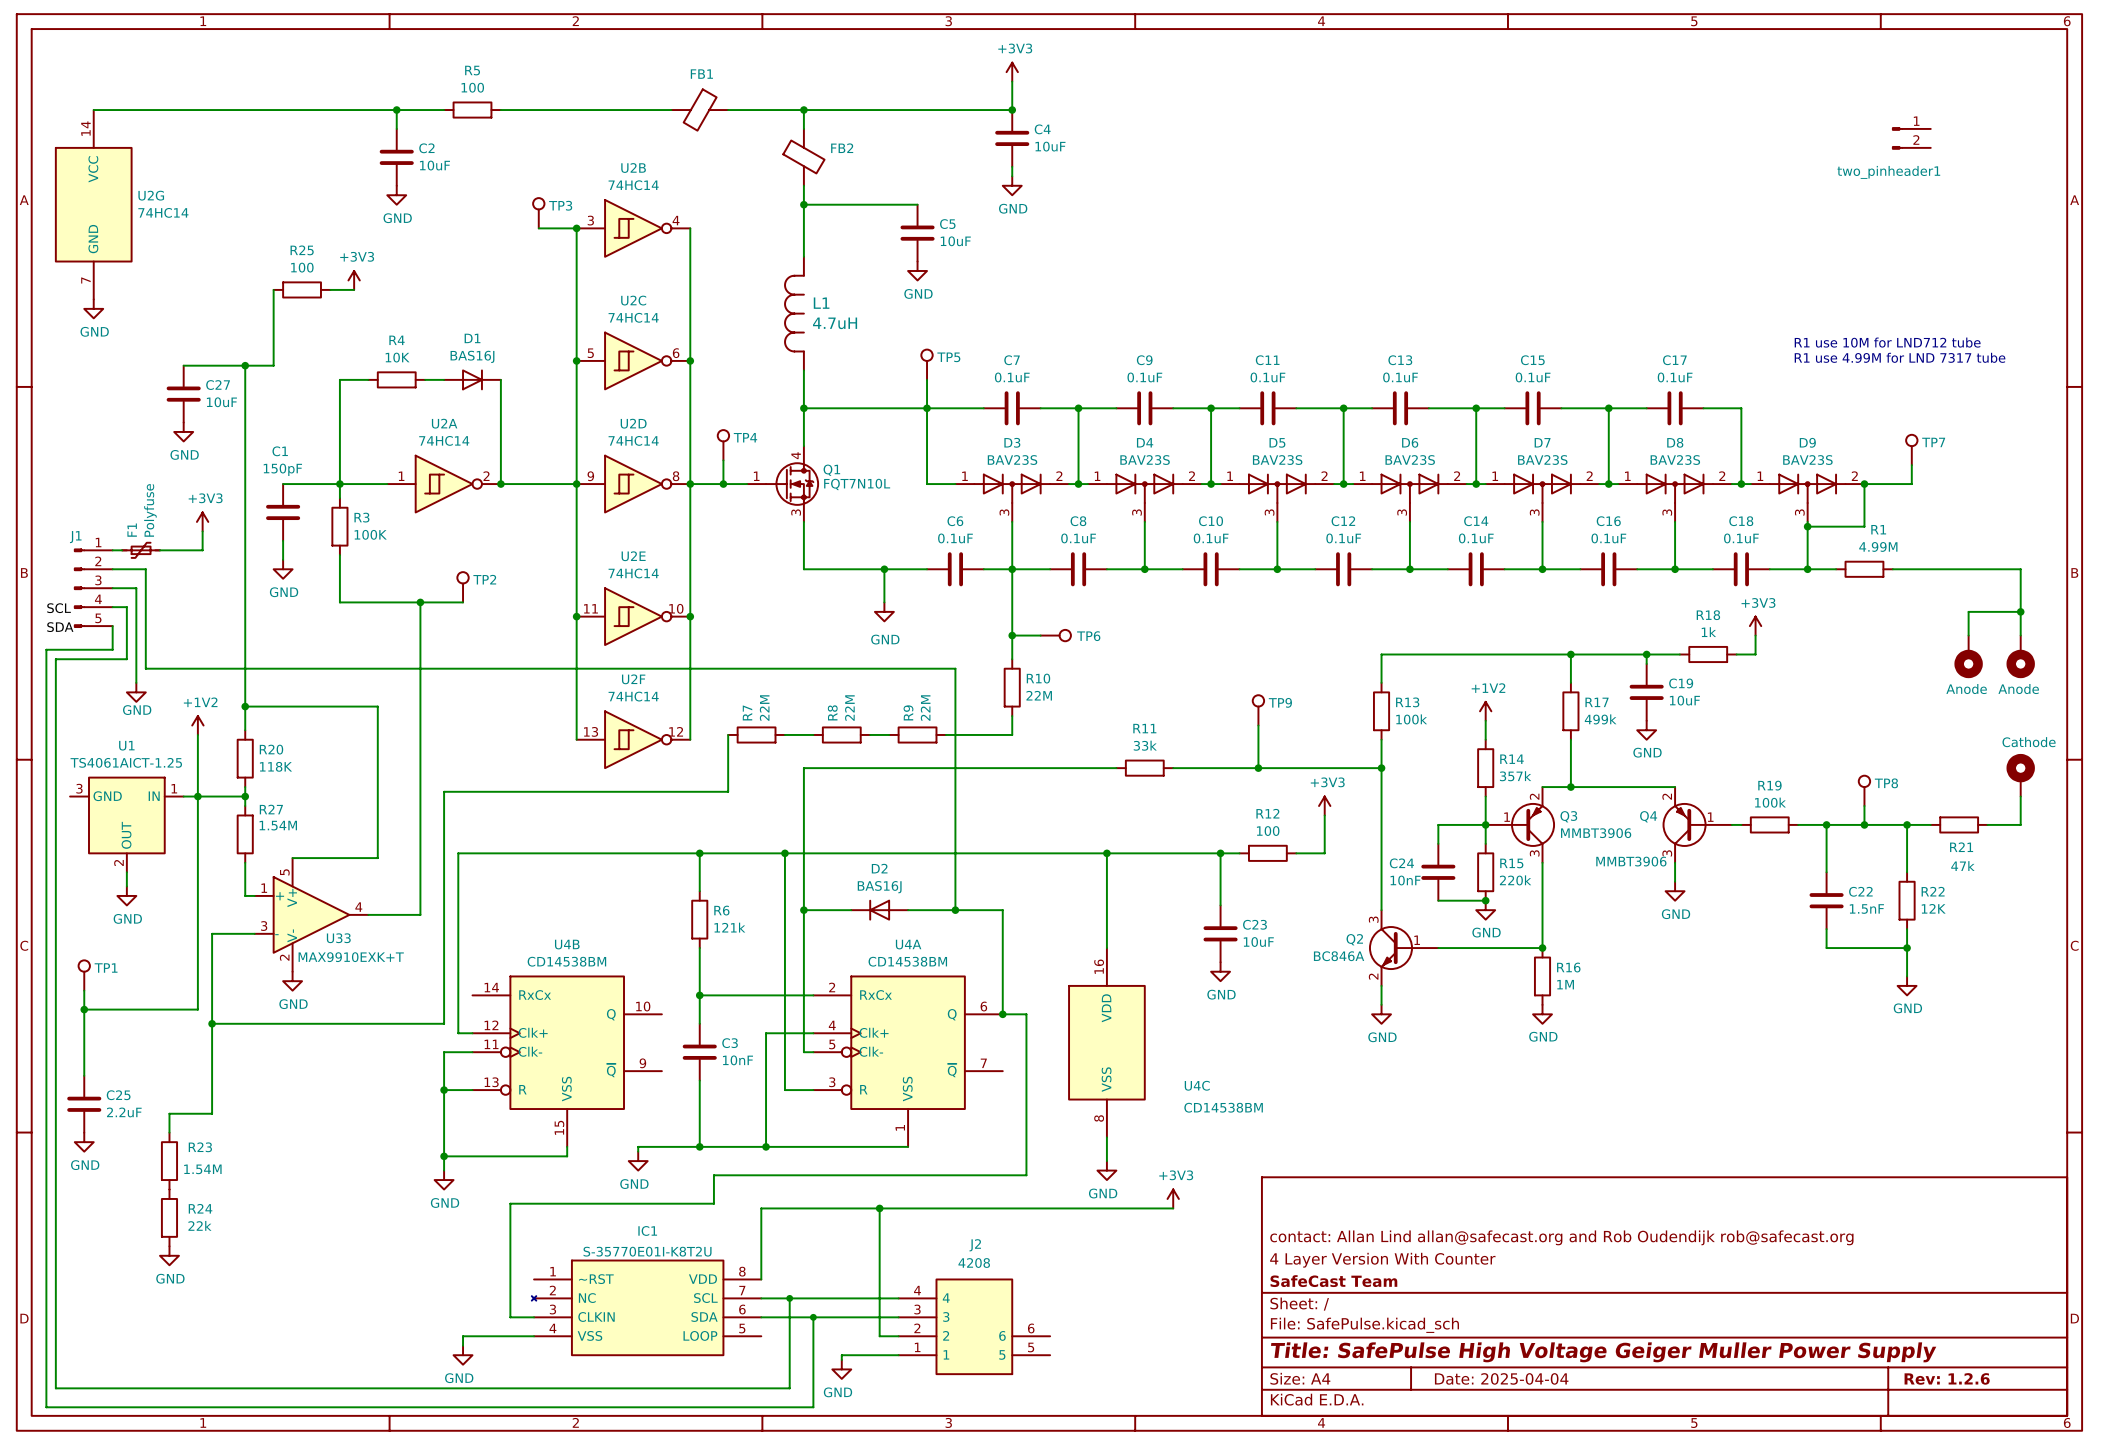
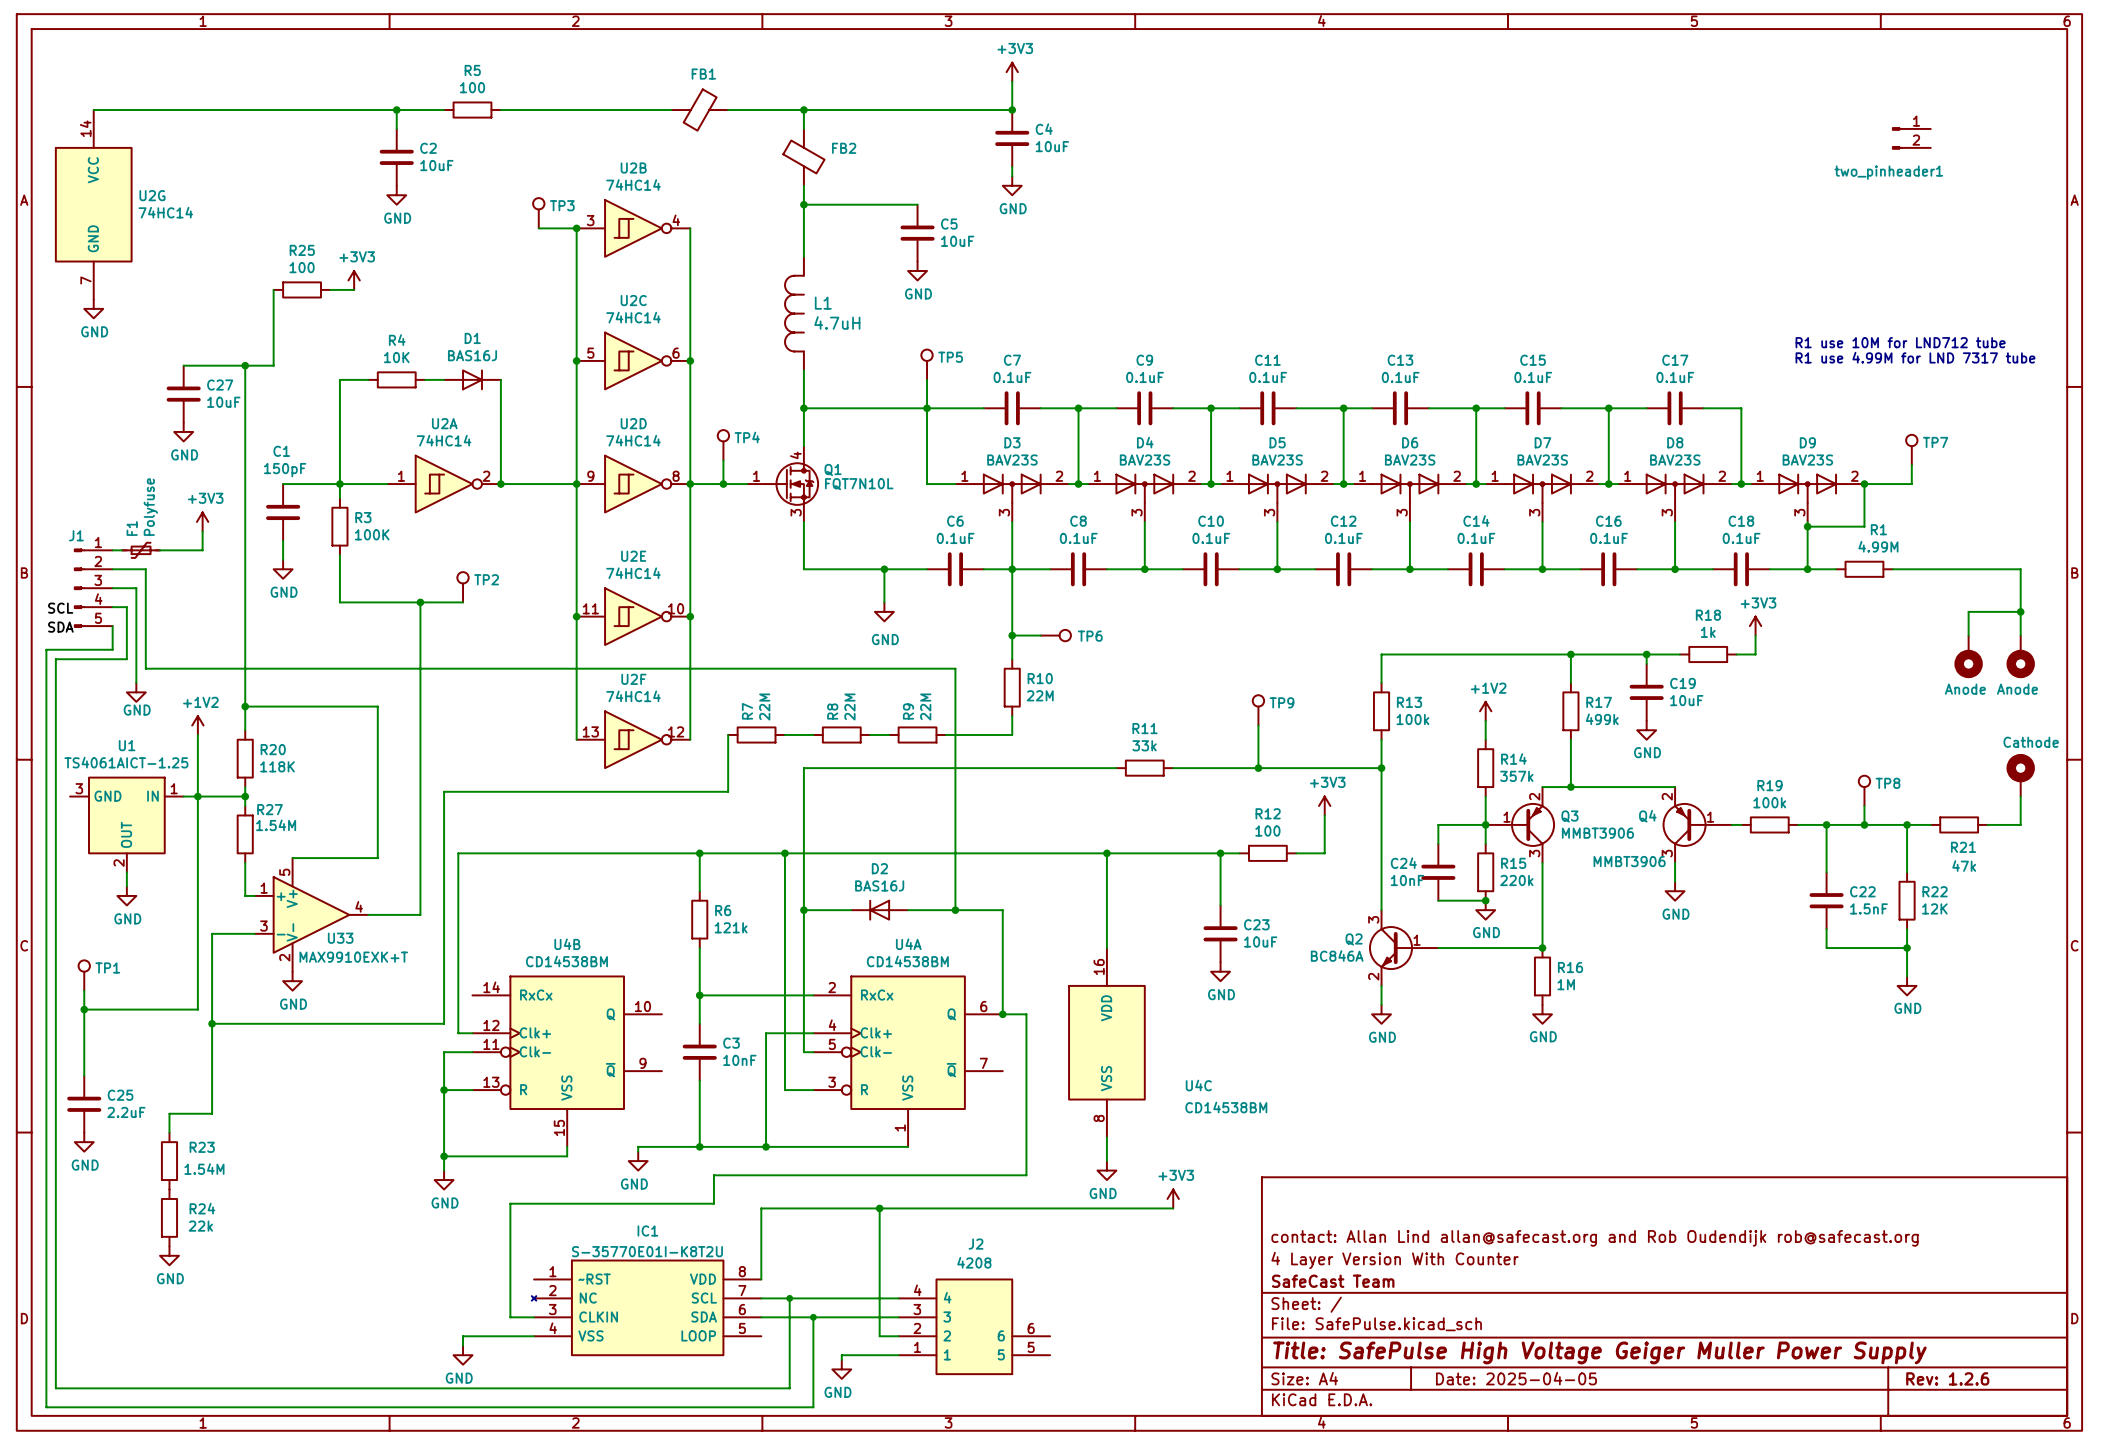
title block: Date: 2025-04-04 (1501, 1378) -> Date: 2025-04-05 (1516, 1378)

